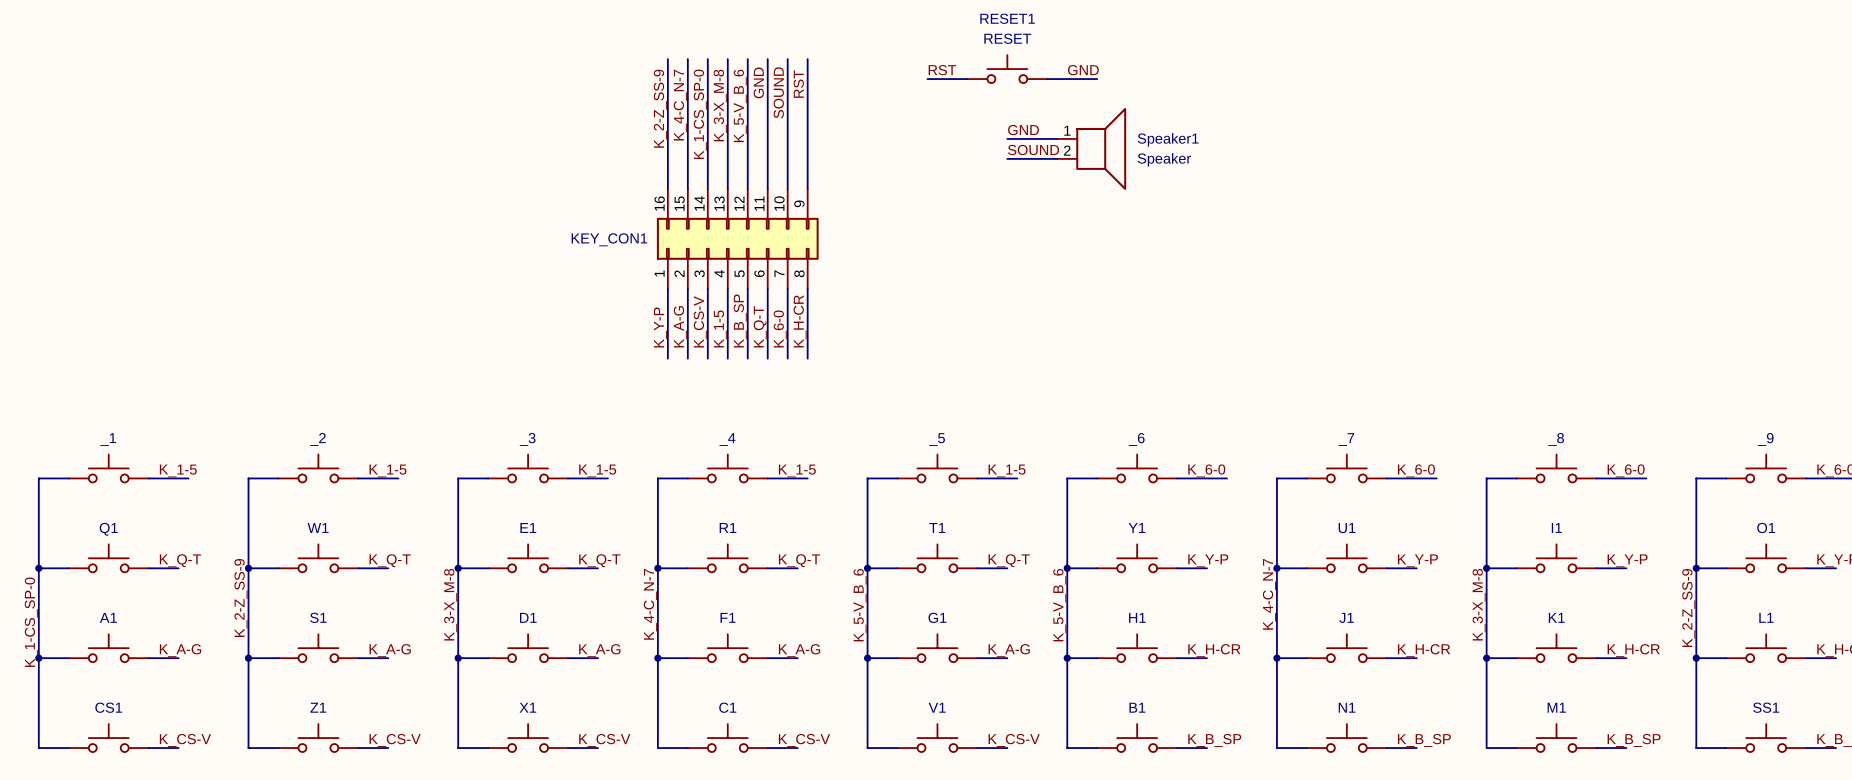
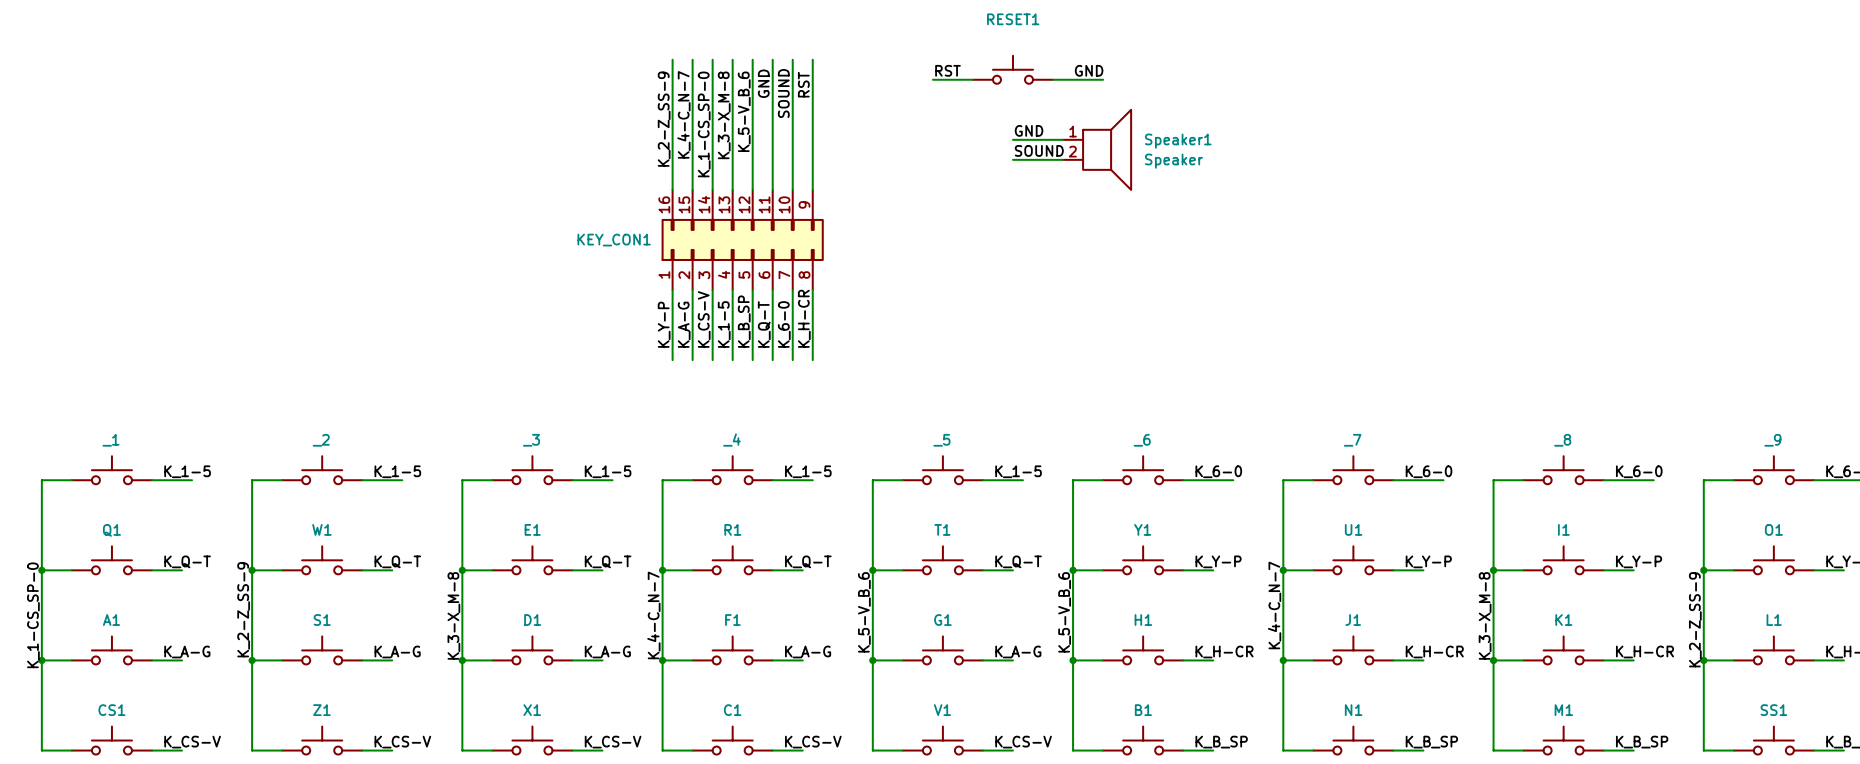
RESET1 value: RESET (1007, 38) -> none

